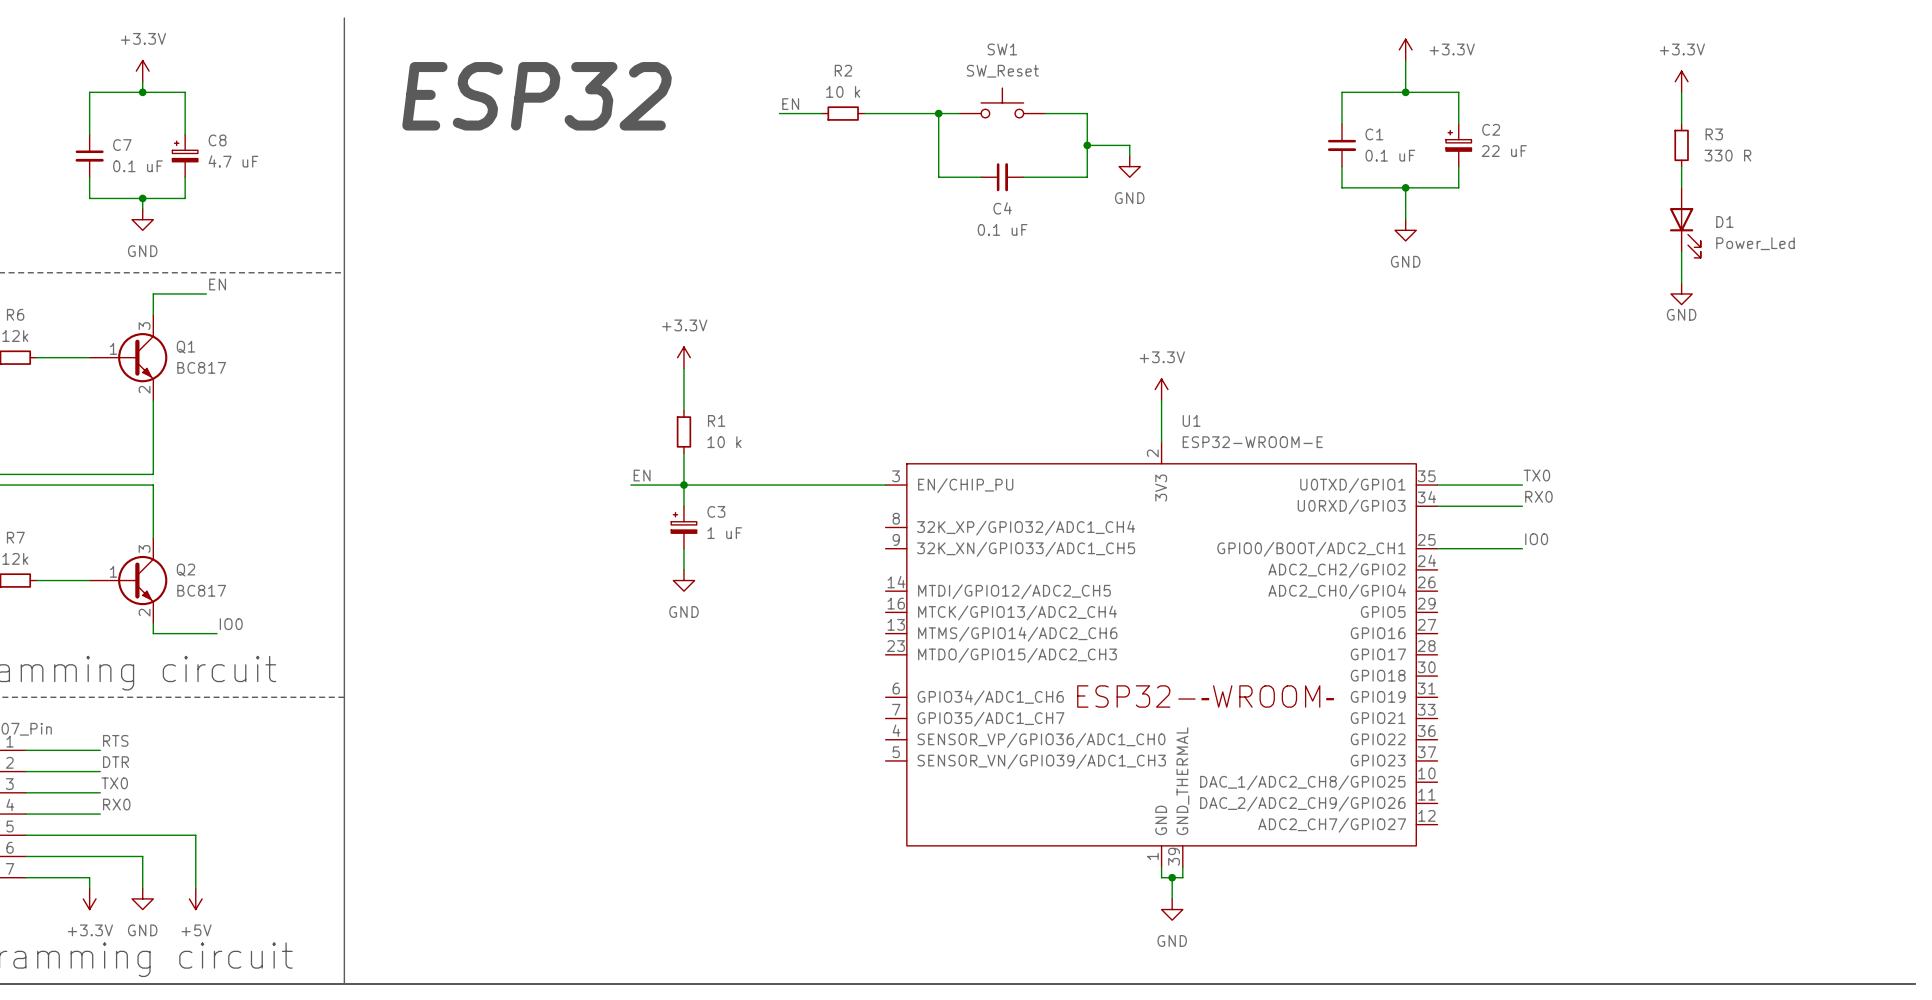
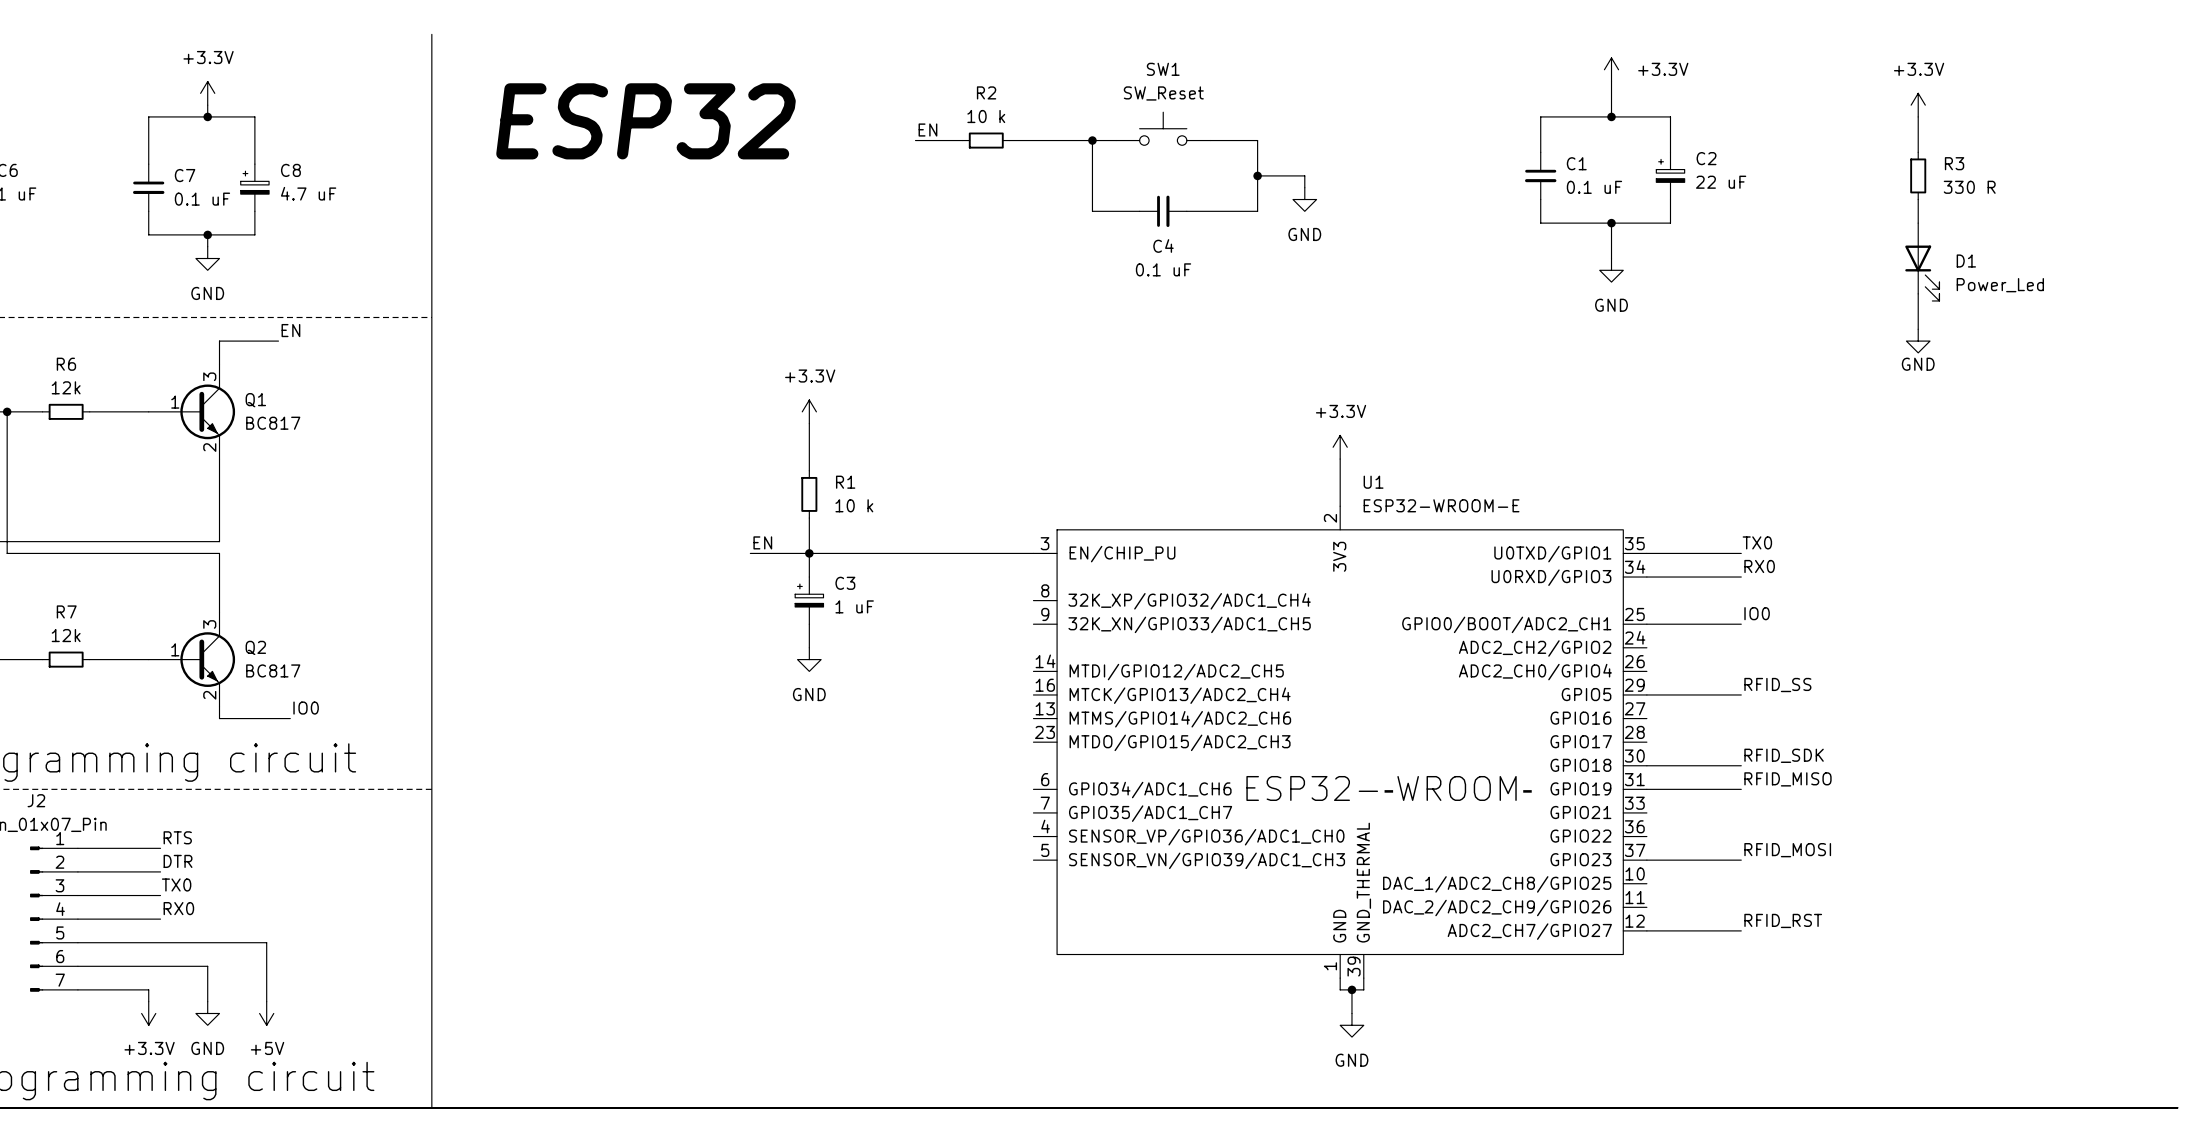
label: none -> RFID_SS (1777, 685)
wire: none -> (1646, 694) (1741, 694)
label: none -> RFID_SDK (1784, 755)
wire: none -> (1646, 765) (1741, 765)
label: none -> RFID_MISO (1787, 779)
wire: none -> (1646, 789) (1741, 789)
label: none -> RFID_MOSI (1787, 850)
wire: none -> (1646, 860) (1741, 860)
label: none -> RFID_RST (1783, 920)
wire: none -> (1646, 930) (1741, 930)

